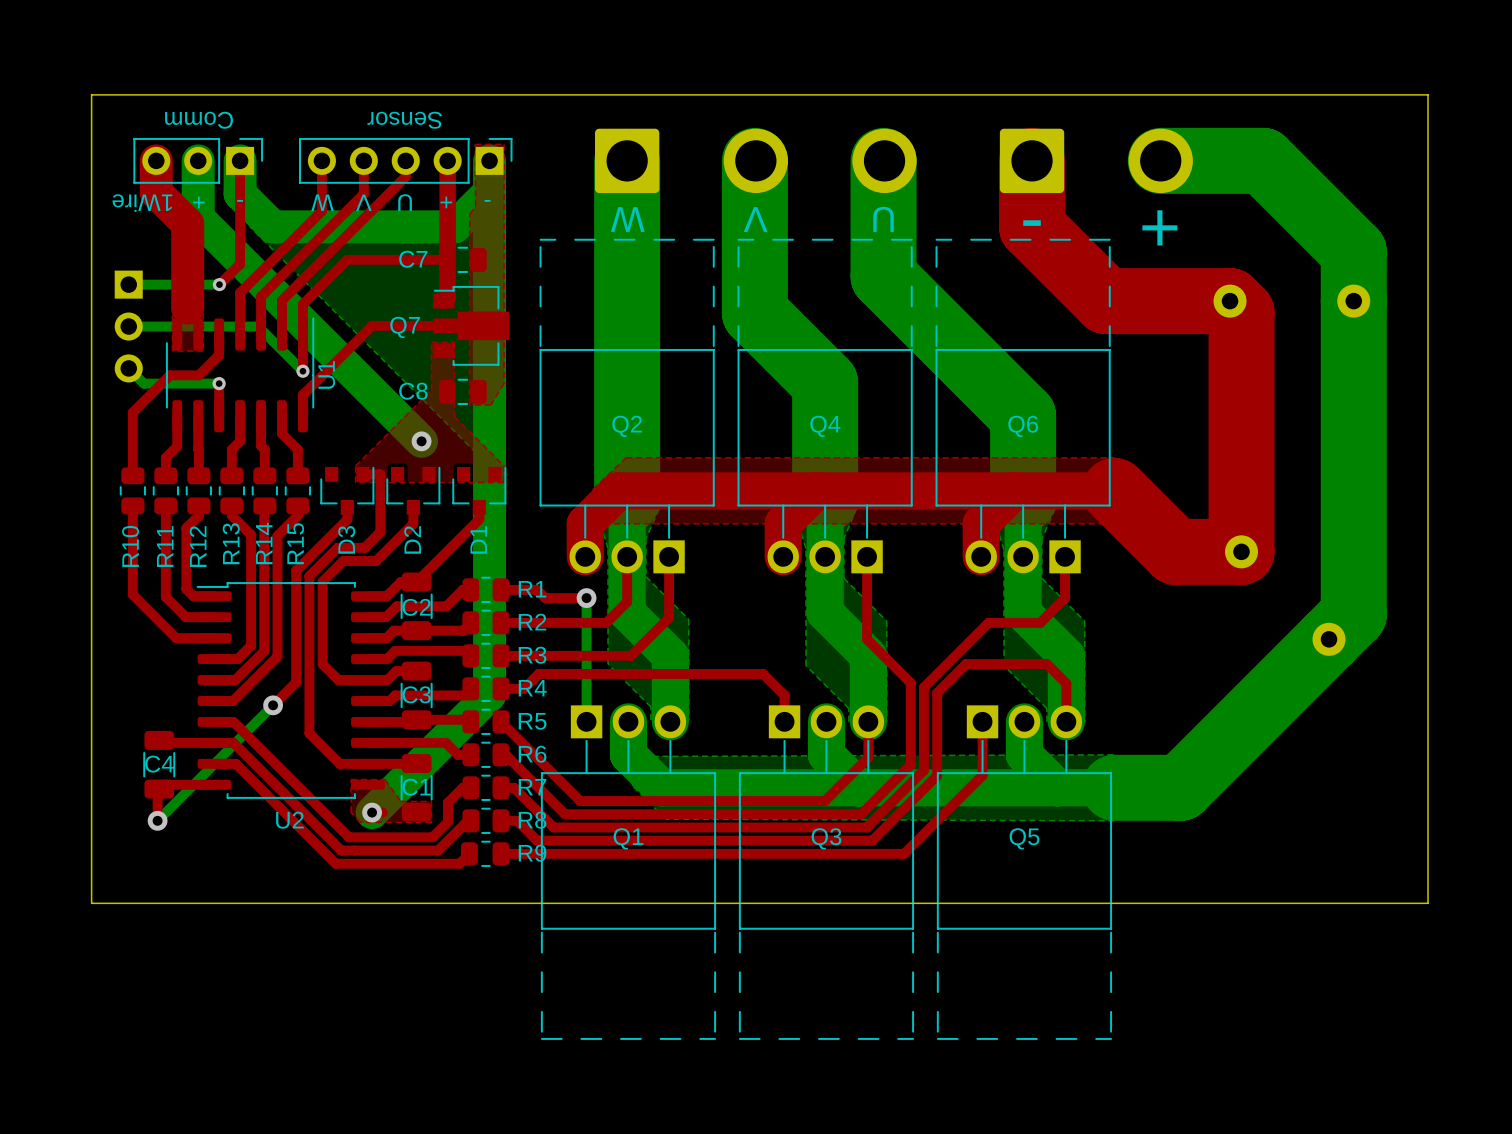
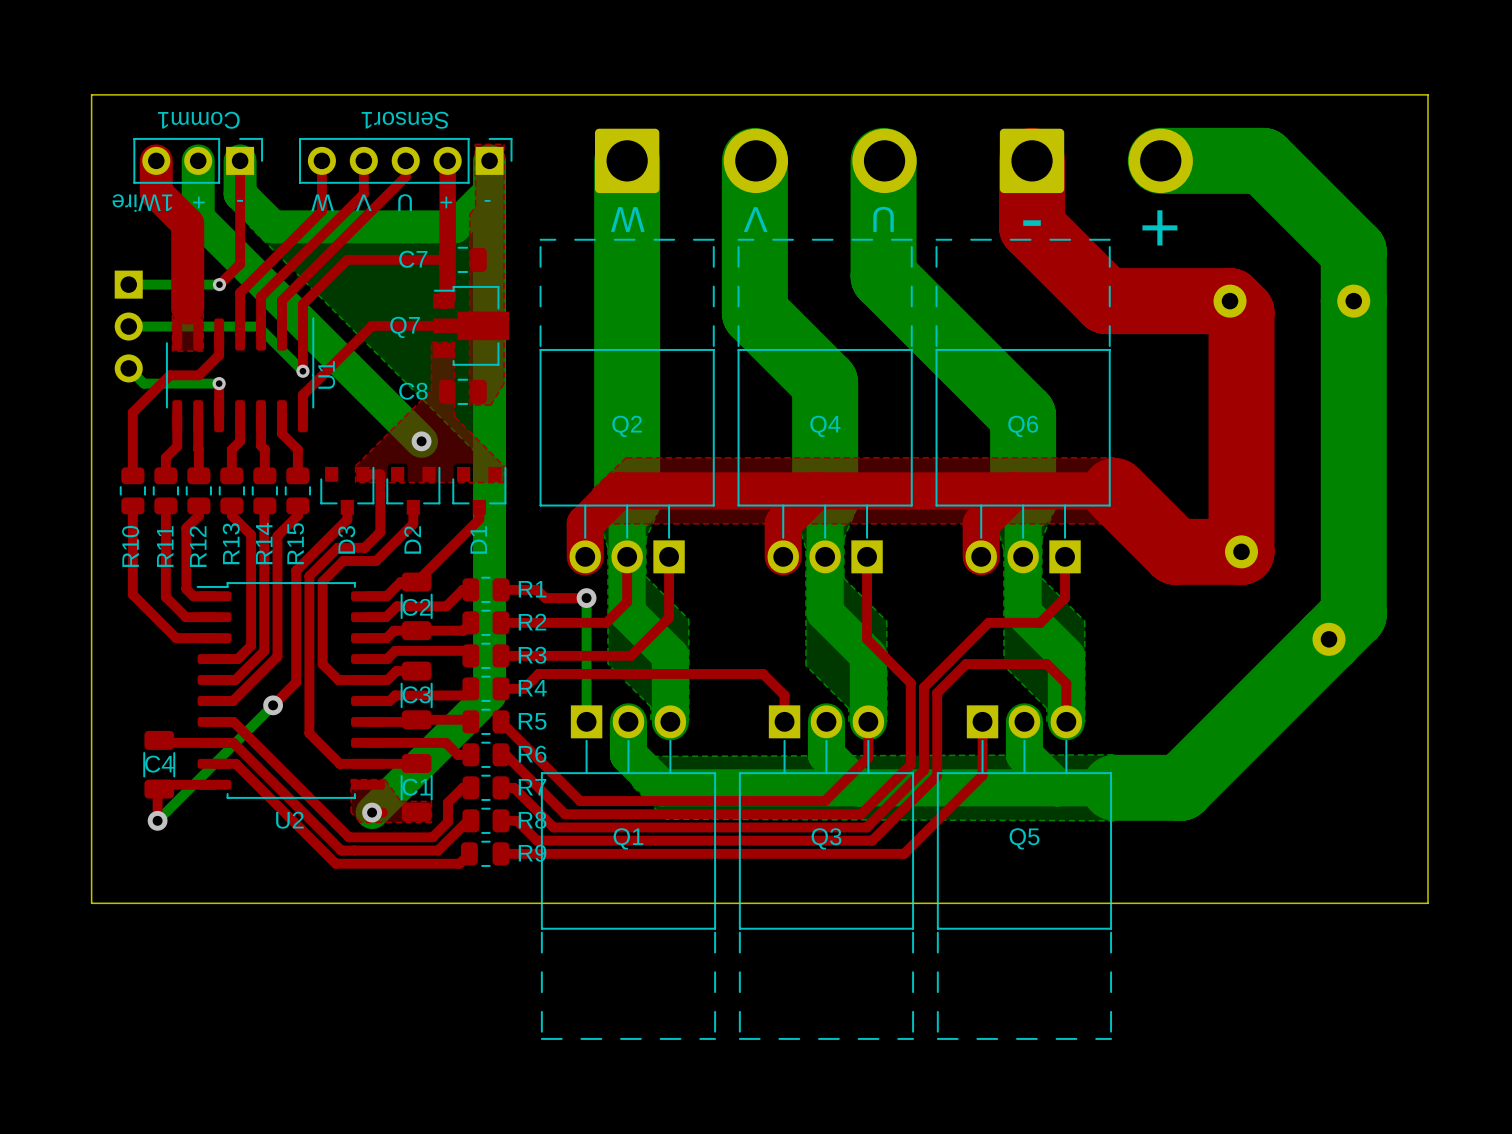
Comm name: Comm (199, 120) -> Comm1 (198, 120)
Sensor name: Sensor (404, 120) -> Sensor1 (405, 120)

